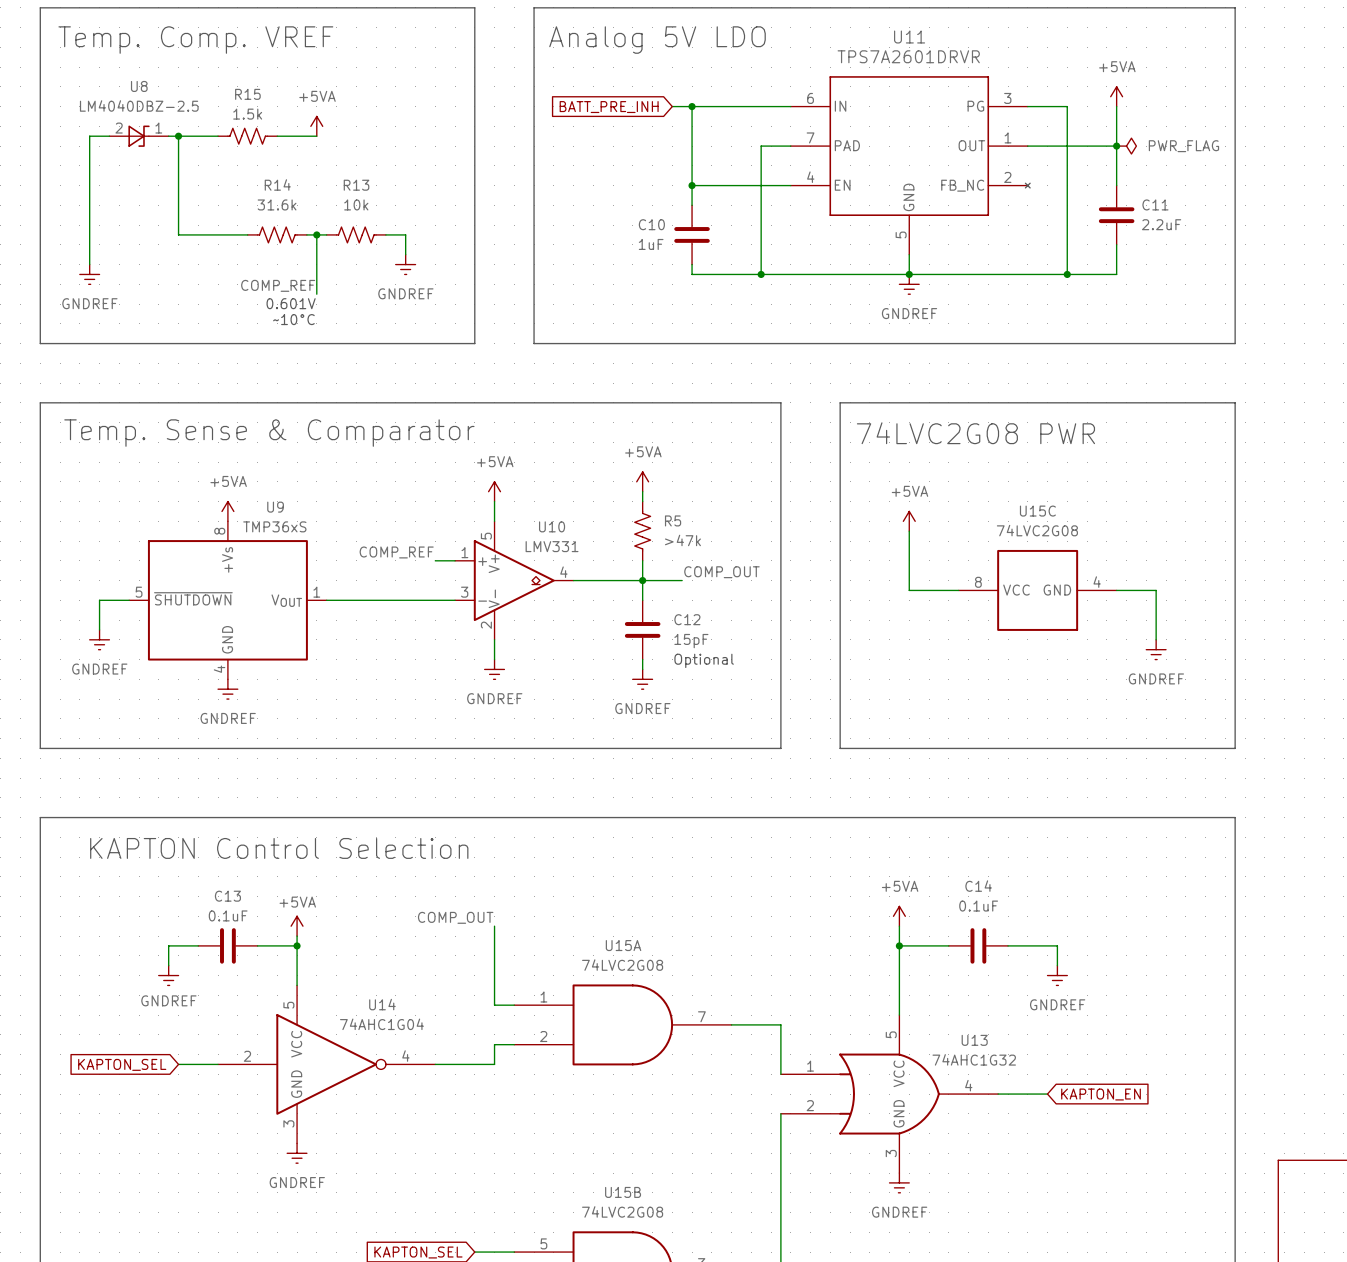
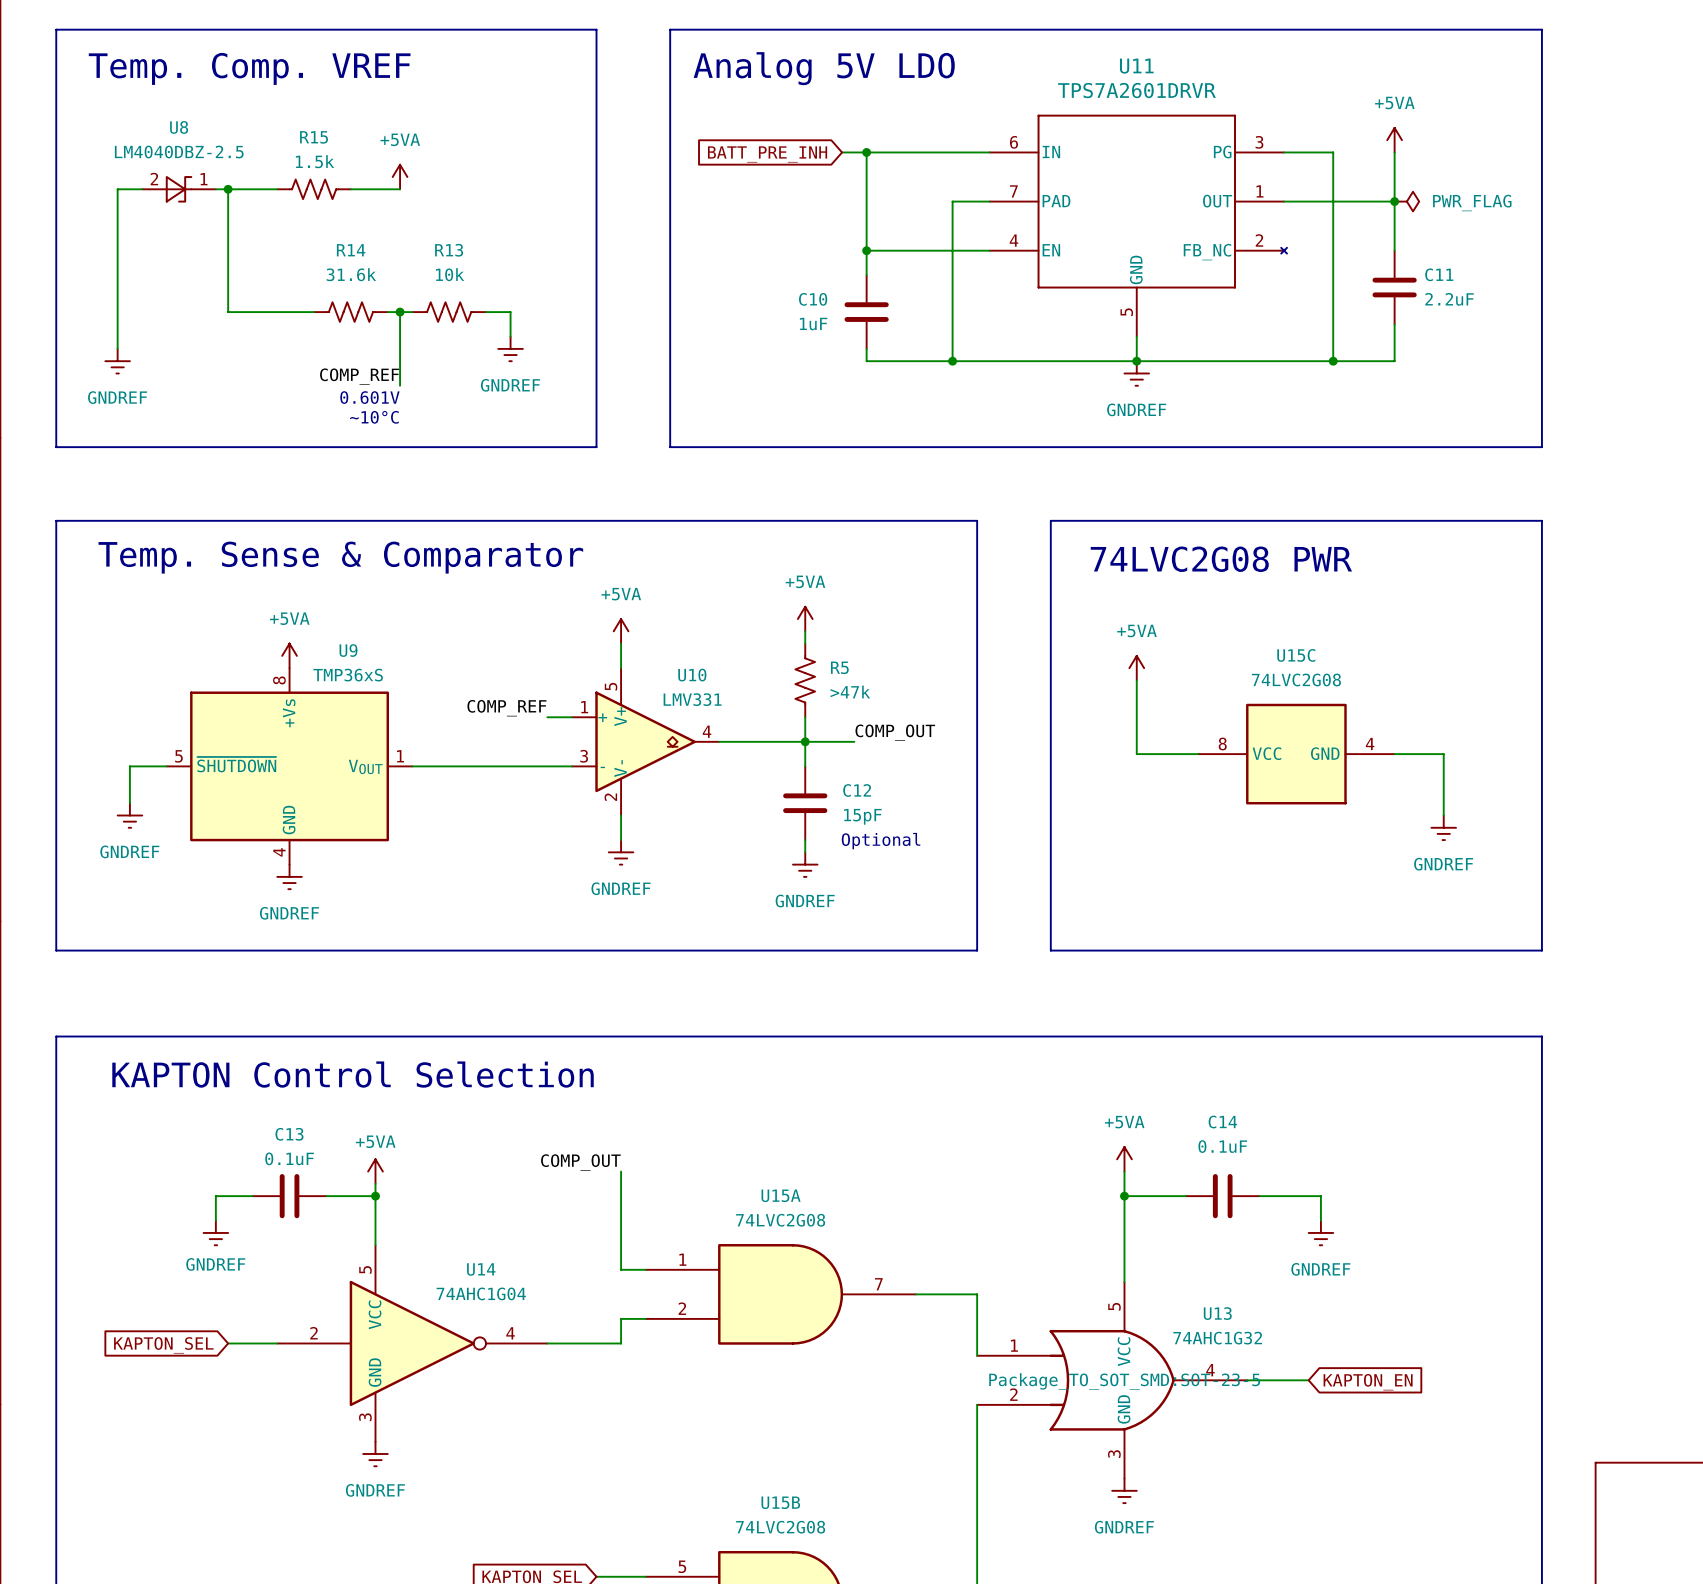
U13 text: none -> Package_TO_SOT_SMD:SOT-23-5 (1124, 1381)

